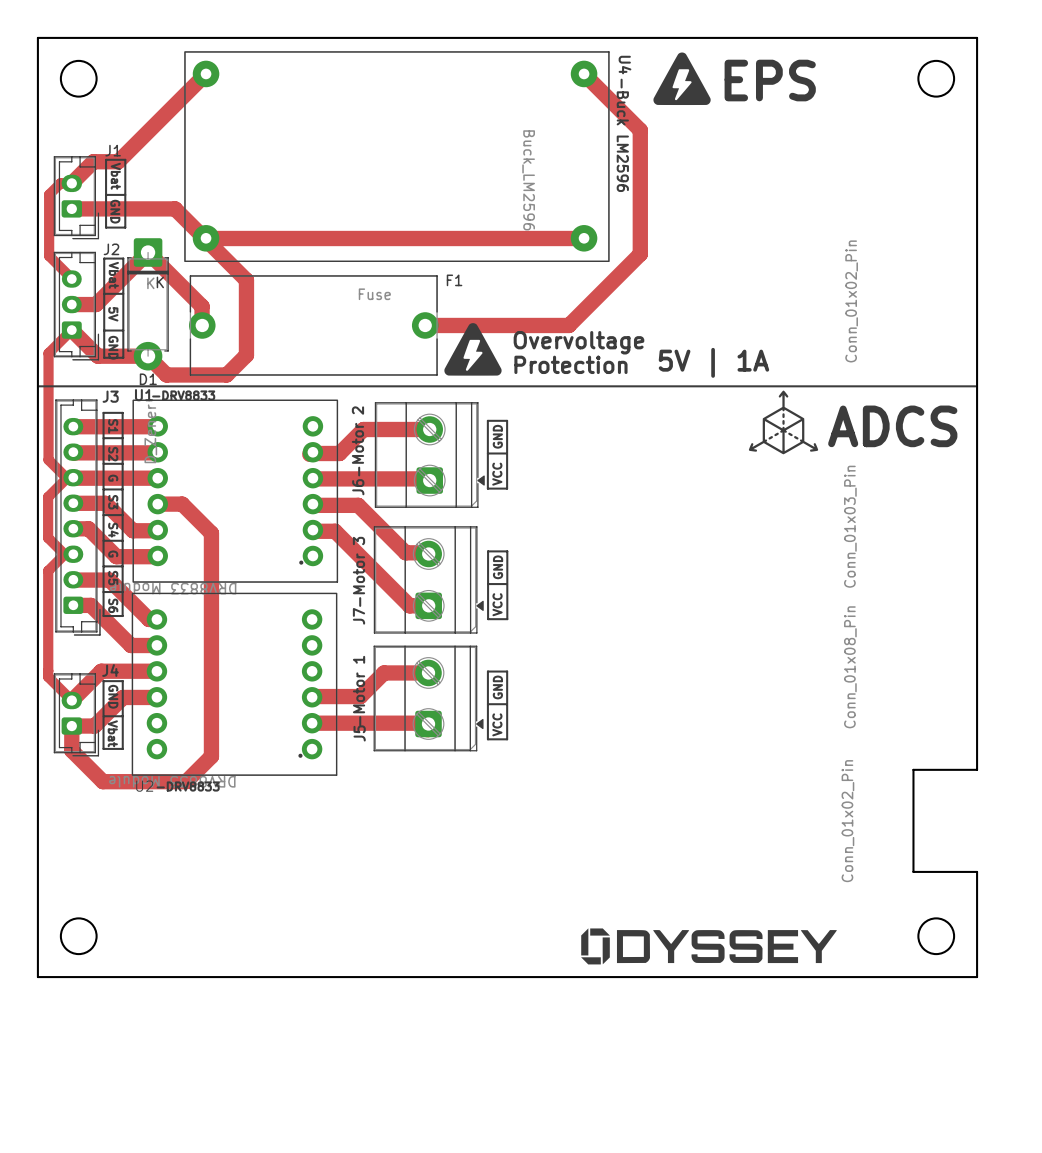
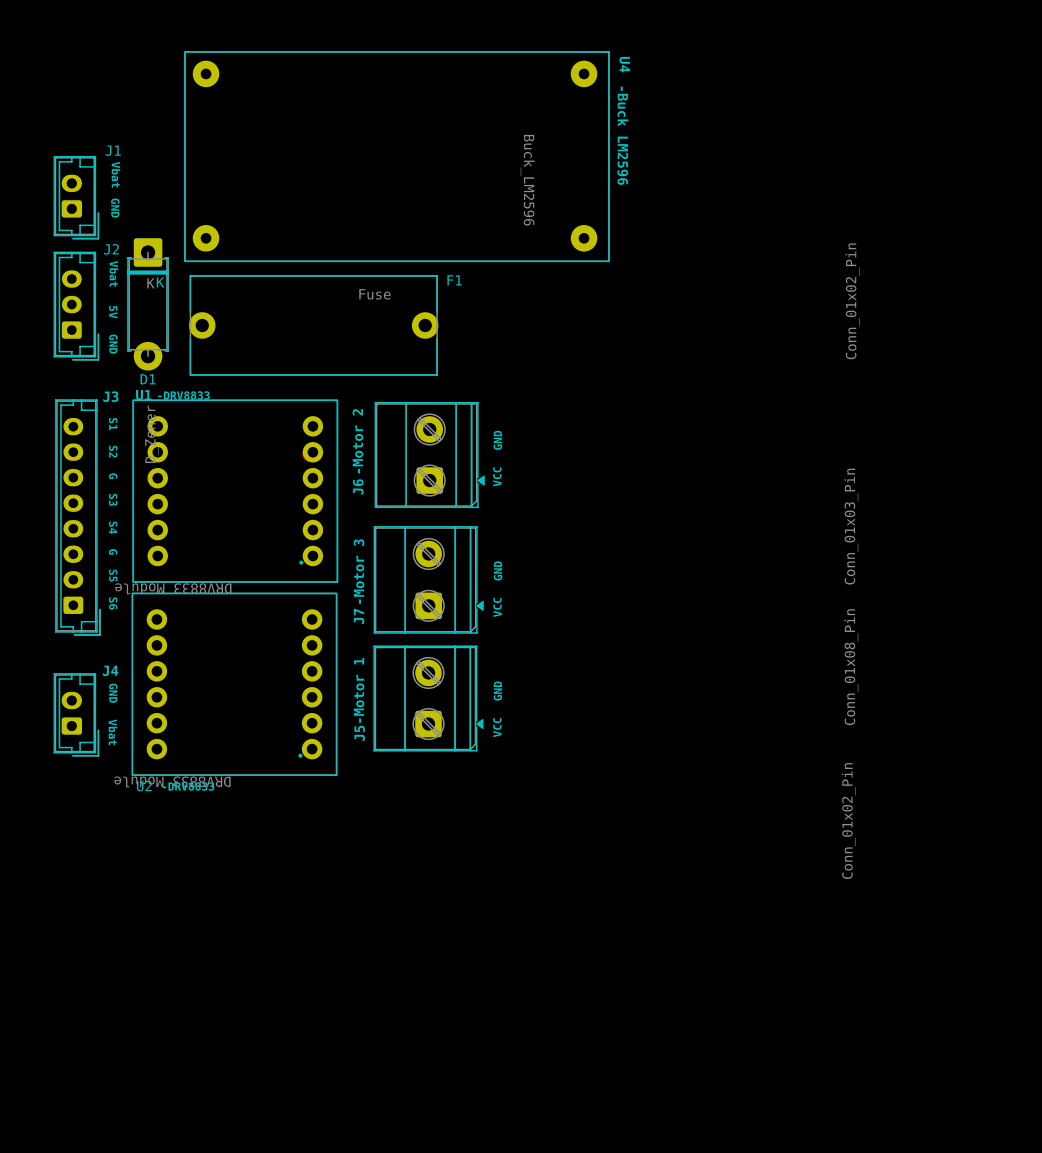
board edge: (37, 37) (37, 977) (977, 977) (977, 871) (913, 871) (913, 769) (977, 769) (977, 37) (37, 37) -> none
drawing: [653, 52, 711, 106] -> none
round board edge: [59, 59, 98, 98] -> none
round board edge: [917, 59, 956, 98] -> none
top track: (206, 73) (118, 161) (93, 161) (71, 183) (60, 183) (49, 194) (49, 255) (71, 278) -> none
top track: (584, 74) (640, 130) (640, 254) (568, 325) (426, 325) (425, 327) -> none
text: EPS (770, 80) -> none
line: (106, 159) (125, 159) (125, 227) (106, 227) (106, 159) -> none
line: (106, 194) (125, 194) -> none
top track: (72, 208) (175, 208) (246, 280) (246, 355) (226, 374) (166, 374) (148, 356) -> none
top track: (206, 238) (584, 238) -> none
line: (104, 258) (123, 258) (123, 357) (104, 357) (104, 258) -> none
line: (104, 293) (123, 293) -> none
top track: (71, 304) (96, 304) (148, 252) (202, 306) (202, 325) -> none
drawing: [444, 323, 502, 376] -> none
line: (104, 330) (123, 330) -> none
text: Overvoltage (578, 342) -> none
top track: (148, 356) (97, 356) (71, 330) (48, 353) (48, 459) (66, 477) (73, 477) -> none
text: 5V | 1A (713, 362) -> none
text: Protection (570, 364) -> none
line: (39, 386) (975, 386) -> none
drawing: [748, 390, 819, 455] -> none
line: (103, 412) (122, 412) (122, 616) (103, 616) (103, 412) -> none
line: (487, 420) (487, 488) (507, 488) (507, 420) (487, 420) -> none
top track: (157, 426) (71, 426) -> none
text: ADCS (892, 426) -> none
top track: (429, 429) (363, 429) (339, 453) (313, 453) -> none
line: (103, 438) (122, 438) -> none
top track: (73, 452) (157, 452) -> none
line: (487, 453) (506, 453) -> none
line: (103, 463) (122, 463) -> none
top track: (67, 477) (48, 497) (48, 537) (64, 554) (73, 554) -> none
top track: (72, 478) (157, 478) -> none
top track: (428, 478) (313, 479) -> none
line: (103, 489) (122, 489) -> none
top track: (71, 503) (105, 503) (132, 530) (158, 531) -> none
top track: (157, 504) (182, 504) (211, 533) (211, 756) (186, 781) (102, 781) (71, 750) (71, 726) (94, 726) (123, 697) (156, 697) -> none
top track: (313, 505) (358, 505) (405, 552) (428, 552) -> none
line: (103, 515) (122, 515) -> none
top track: (71, 528) (88, 528) (116, 556) (158, 557) -> none
top track: (313, 531) (335, 531) (409, 605) (428, 605) -> none
line: (103, 540) (122, 540) -> none
line: (488, 551) (507, 551) (507, 619) (488, 619) (488, 551) -> none
top track: (64, 554) (48, 570) (48, 670) -> none
line: (103, 566) (122, 566) -> none
top track: (71, 579) (109, 580) (148, 619) (156, 619) -> none
line: (488, 584) (507, 584) -> none
line: (103, 592) (122, 592) -> none
top track: (71, 605) (90, 605) (131, 645) (156, 645) -> none
top track: (48, 671) (48, 676) (71, 700) (77, 700) -> none
top track: (156, 671) (101, 671) (72, 700) -> none
line: (487, 671) (507, 671) (507, 739) (487, 739) (487, 671) -> none
top track: (428, 672) (384, 672) (360, 696) (312, 697) -> none
line: (103, 681) (103, 748) (122, 748) (122, 681) (103, 681) -> none
line: (487, 704) (506, 704) -> none
line: (103, 716) (122, 716) -> none
top track: (312, 723) (428, 724) -> none
round board edge: [59, 917, 98, 956] -> none
round board edge: [917, 917, 956, 956] -> none
drawing: [581, 928, 837, 965] -> none

